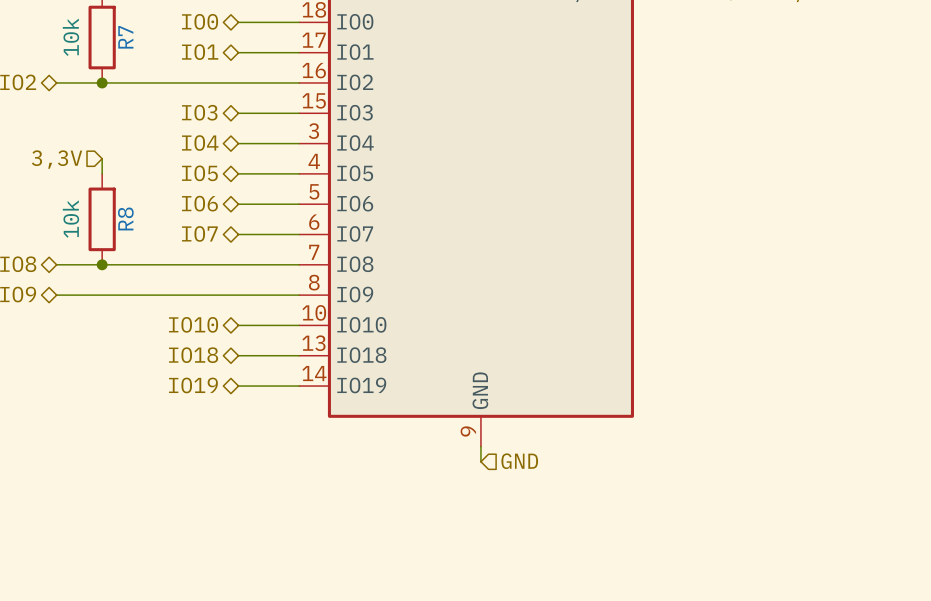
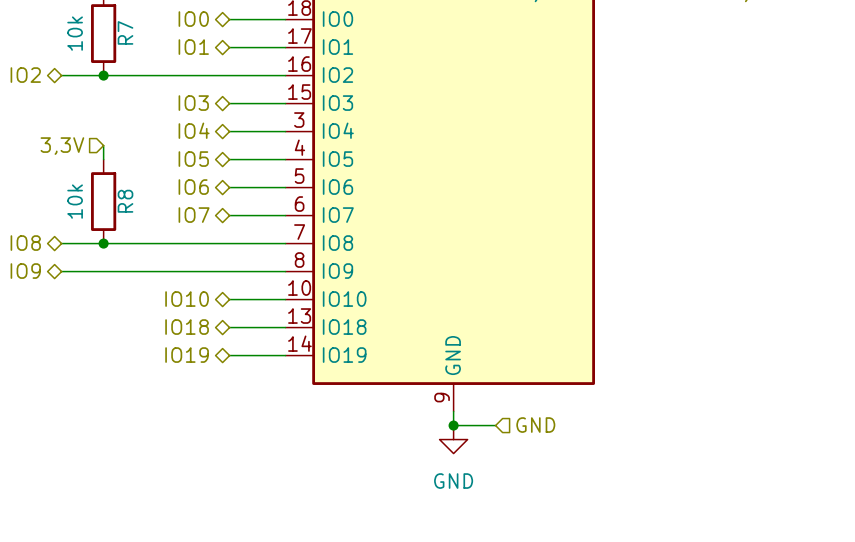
wire: none -> (453, 425) (495, 425)
junction: none -> (453, 425)
hierarchical label position: GND (519, 461) -> GND (535, 425)
power symbol: none -> GND (453, 439)

